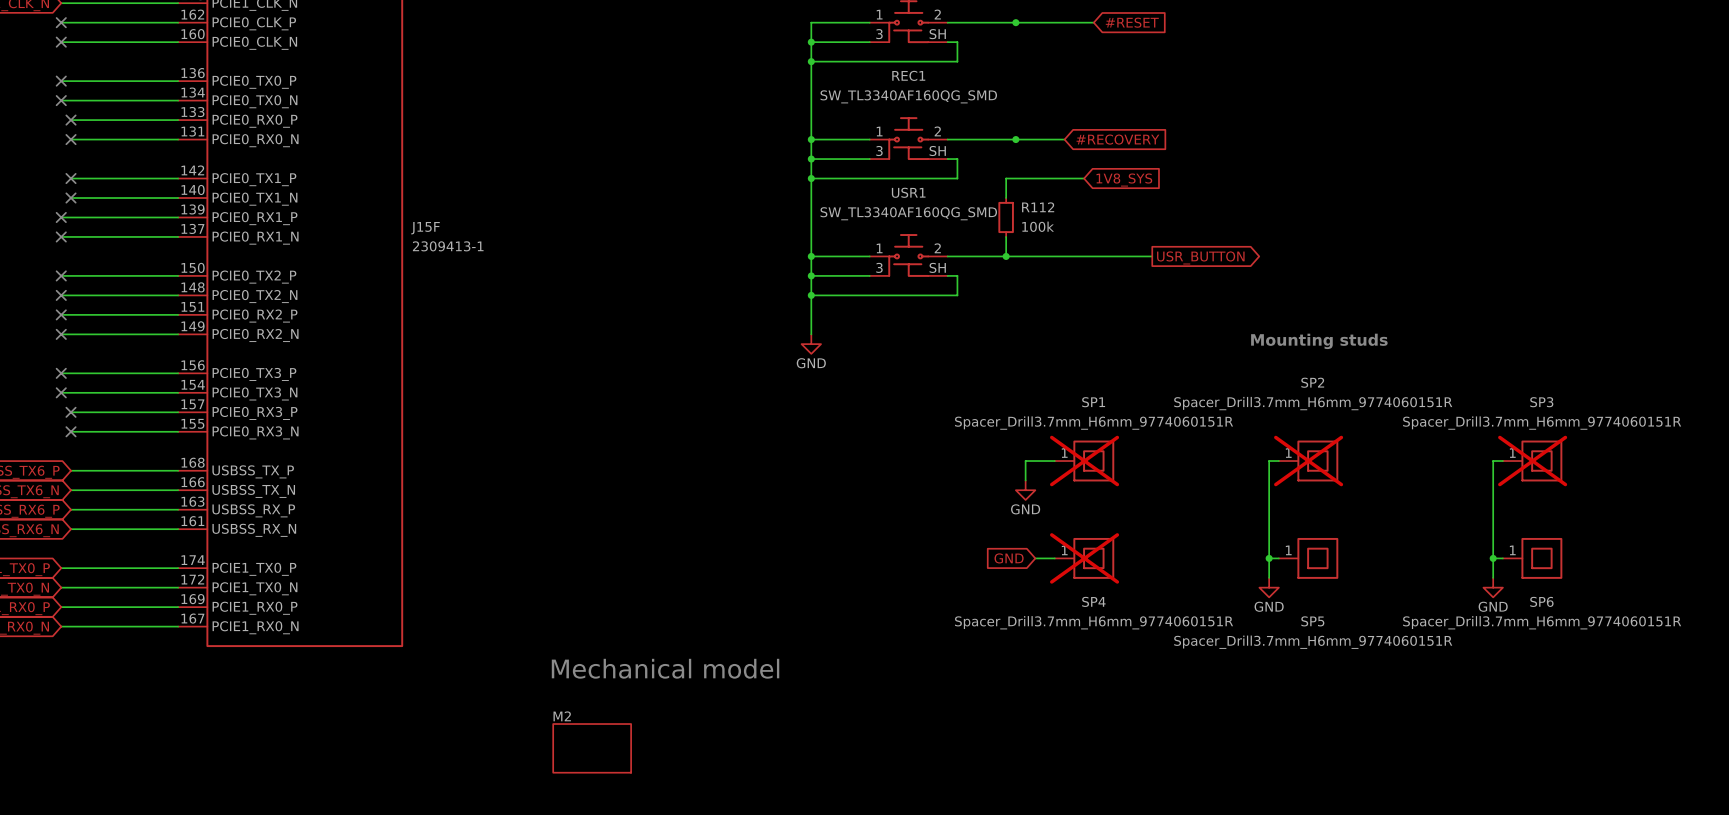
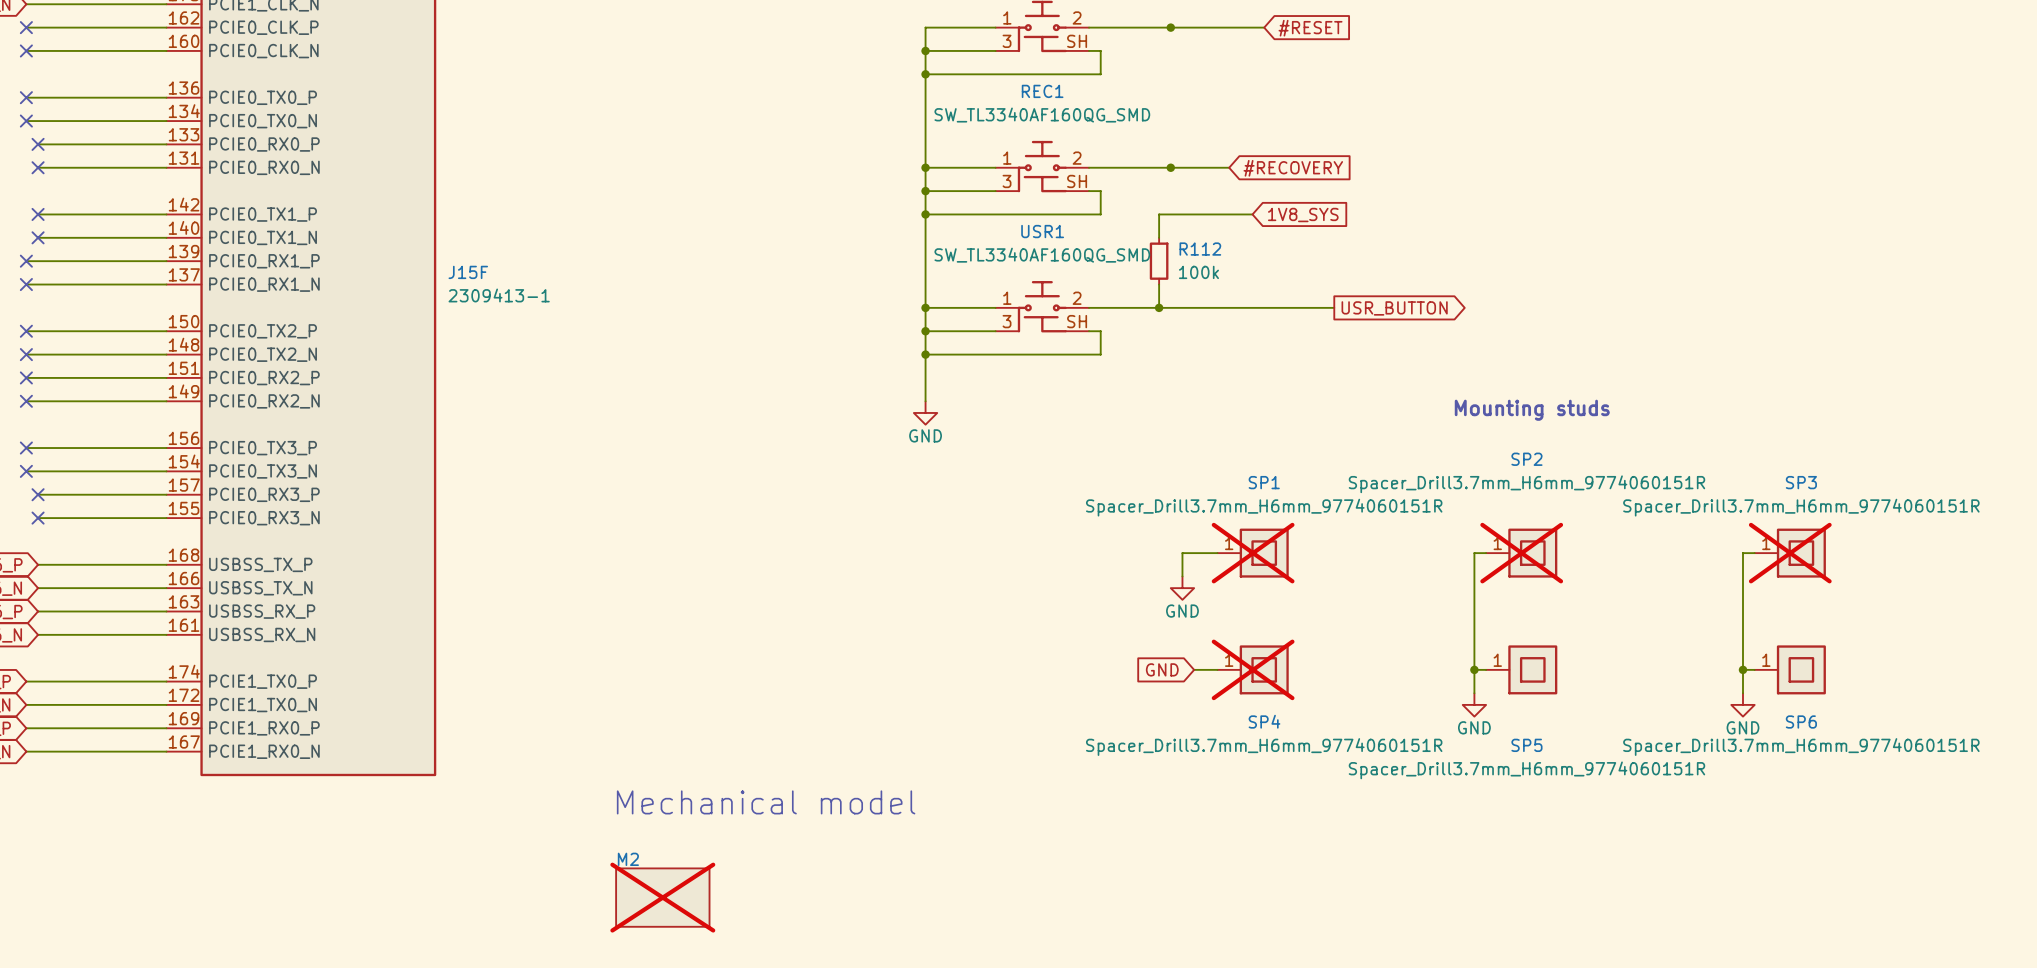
M2 do-not-place cross: none -> (662, 897)

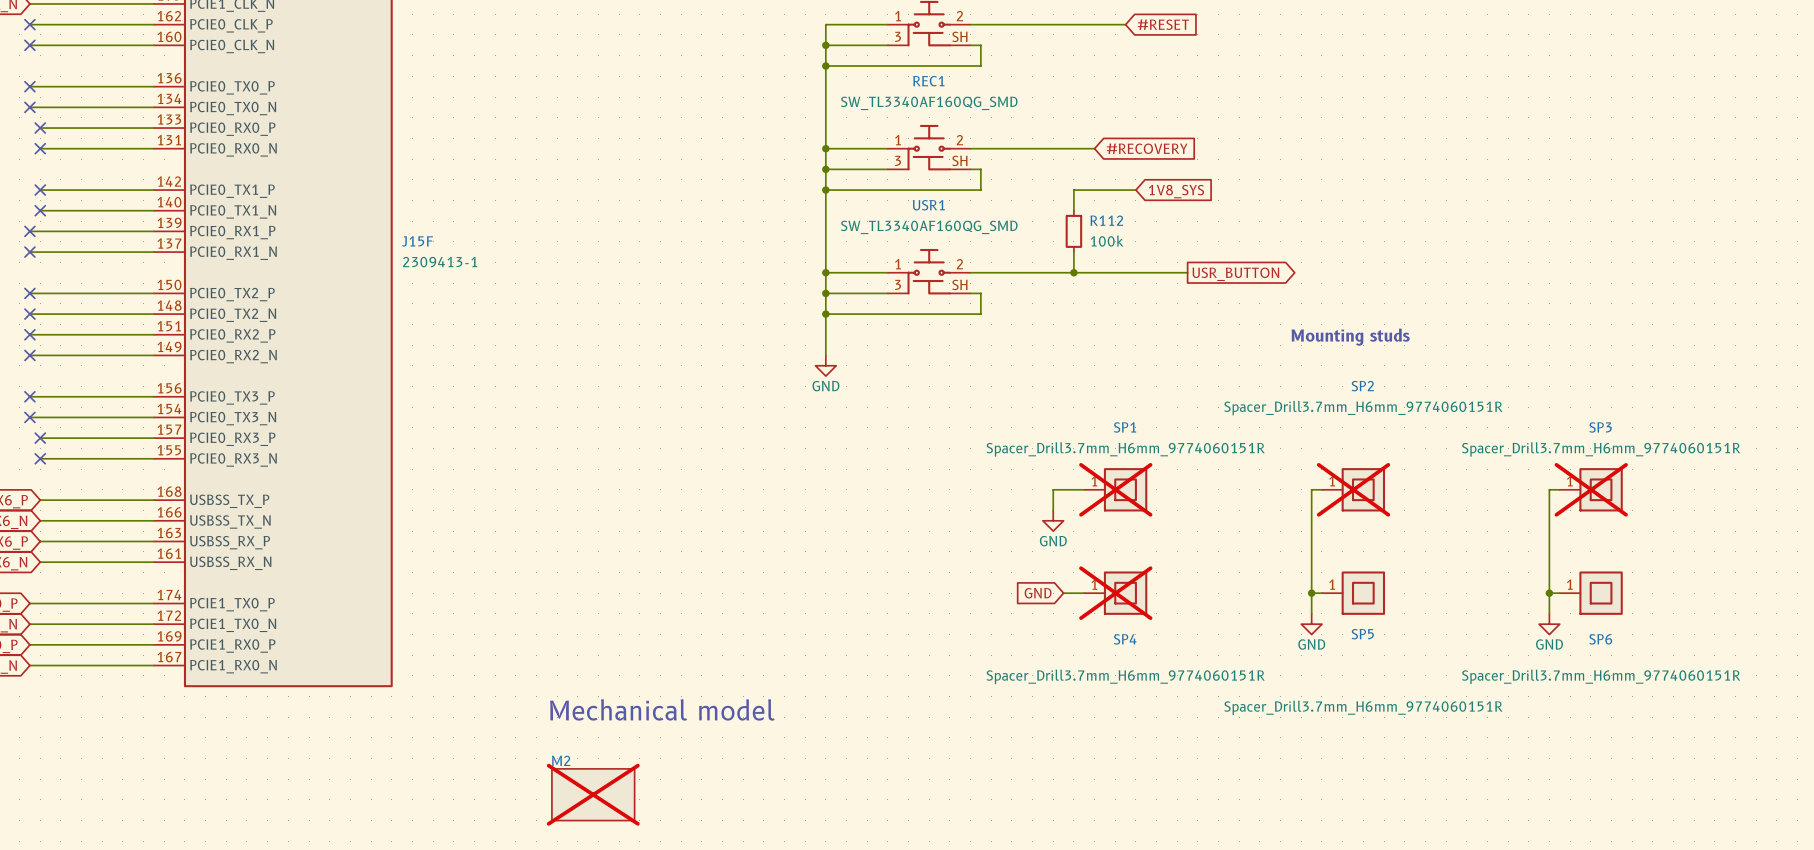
junction: (1170, 27) -> none
junction: (1170, 167) -> none
wire: (1205, 214) (1159, 214) (1159, 237) -> (1073, 190) (1073, 210)
wire: none -> (1115, 190) (1135, 190)
global label position: 1V8_SYS (1303, 215) -> 1V8_SYS (1176, 191)
R112 position: (1159, 261) -> (1073, 231)
wire: (1159, 284) (1159, 307) -> (1073, 252) (1073, 272)
junction position: (1159, 307) -> (1073, 272)
text position: Mounting studs (1532, 410) -> Mounting studs (1350, 337)
SP2 name position: SP2 (1526, 459) -> SP2 (1362, 386)
SP2 value position: Spacer_Drill3.7mm_H6mm_9774060151R (1526, 484) -> Spacer_Drill3.7mm_H6mm_9774060151R (1363, 408)
SP5 name position: SP5 (1526, 745) -> SP5 (1362, 634)
SP4 value position: Spacer_Drill3.7mm_H6mm_9774060151R (1264, 747) -> Spacer_Drill3.7mm_H6mm_9774060151R (1125, 676)
SP6 value position: Spacer_Drill3.7mm_H6mm_9774060151R (1801, 747) -> Spacer_Drill3.7mm_H6mm_9774060151R (1601, 676)
SP5 value position: Spacer_Drill3.7mm_H6mm_9774060151R (1526, 770) -> Spacer_Drill3.7mm_H6mm_9774060151R (1363, 707)

